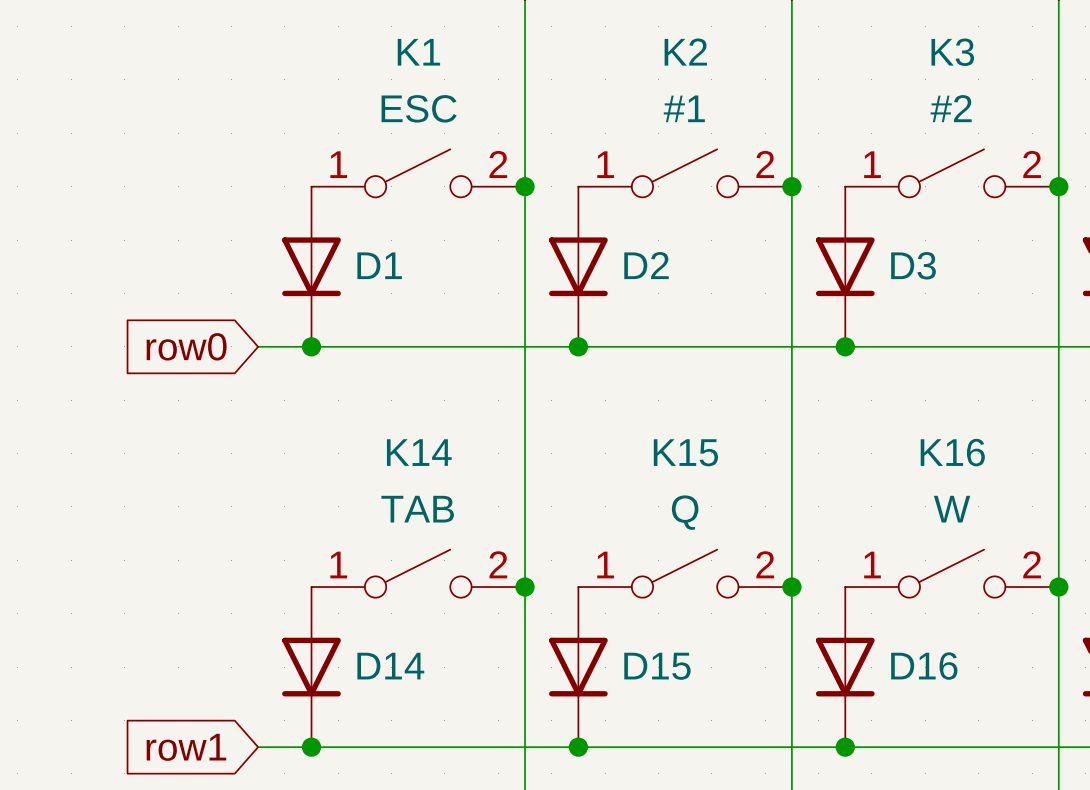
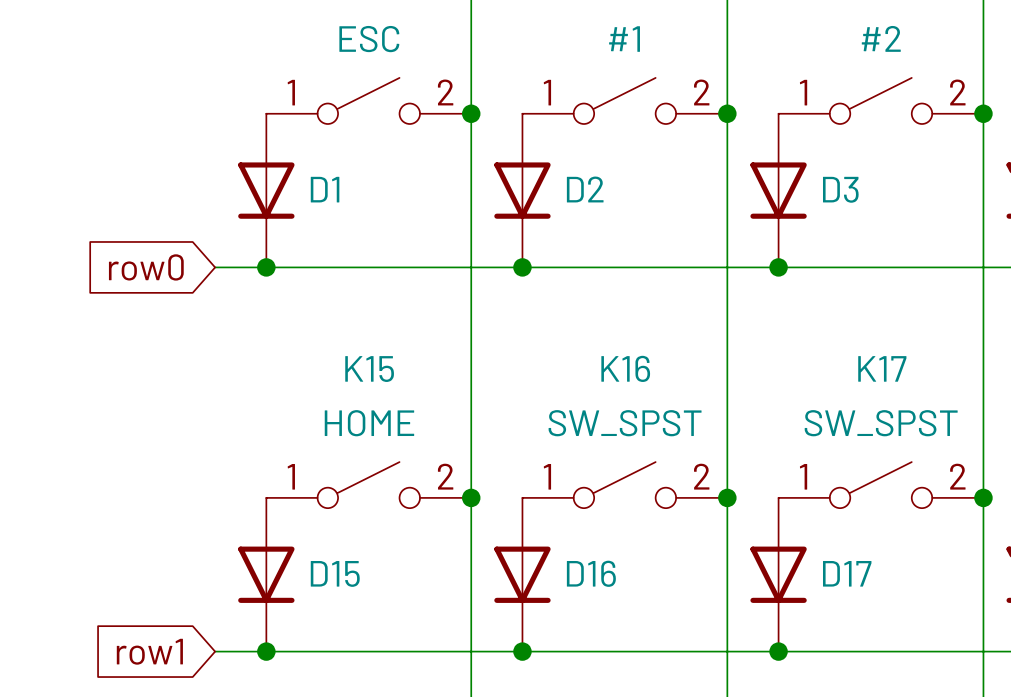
K14 name: K14 (419, 452) -> K15 (369, 369)
K15 name: K15 (685, 452) -> K16 (625, 368)
K16 name: K16 (952, 452) -> K17 (882, 368)
K14 value: TAB (417, 509) -> HOME (369, 423)
K16 value: W (952, 509) -> SW_SPST (881, 423)
K15 value: Q (685, 512) -> SW_SPST (625, 423)
D14 name: D14 (390, 666) -> D15 (335, 573)
D15 name: D15 (657, 666) -> D16 (591, 573)
D16 name: D16 (924, 666) -> D17 (847, 573)

